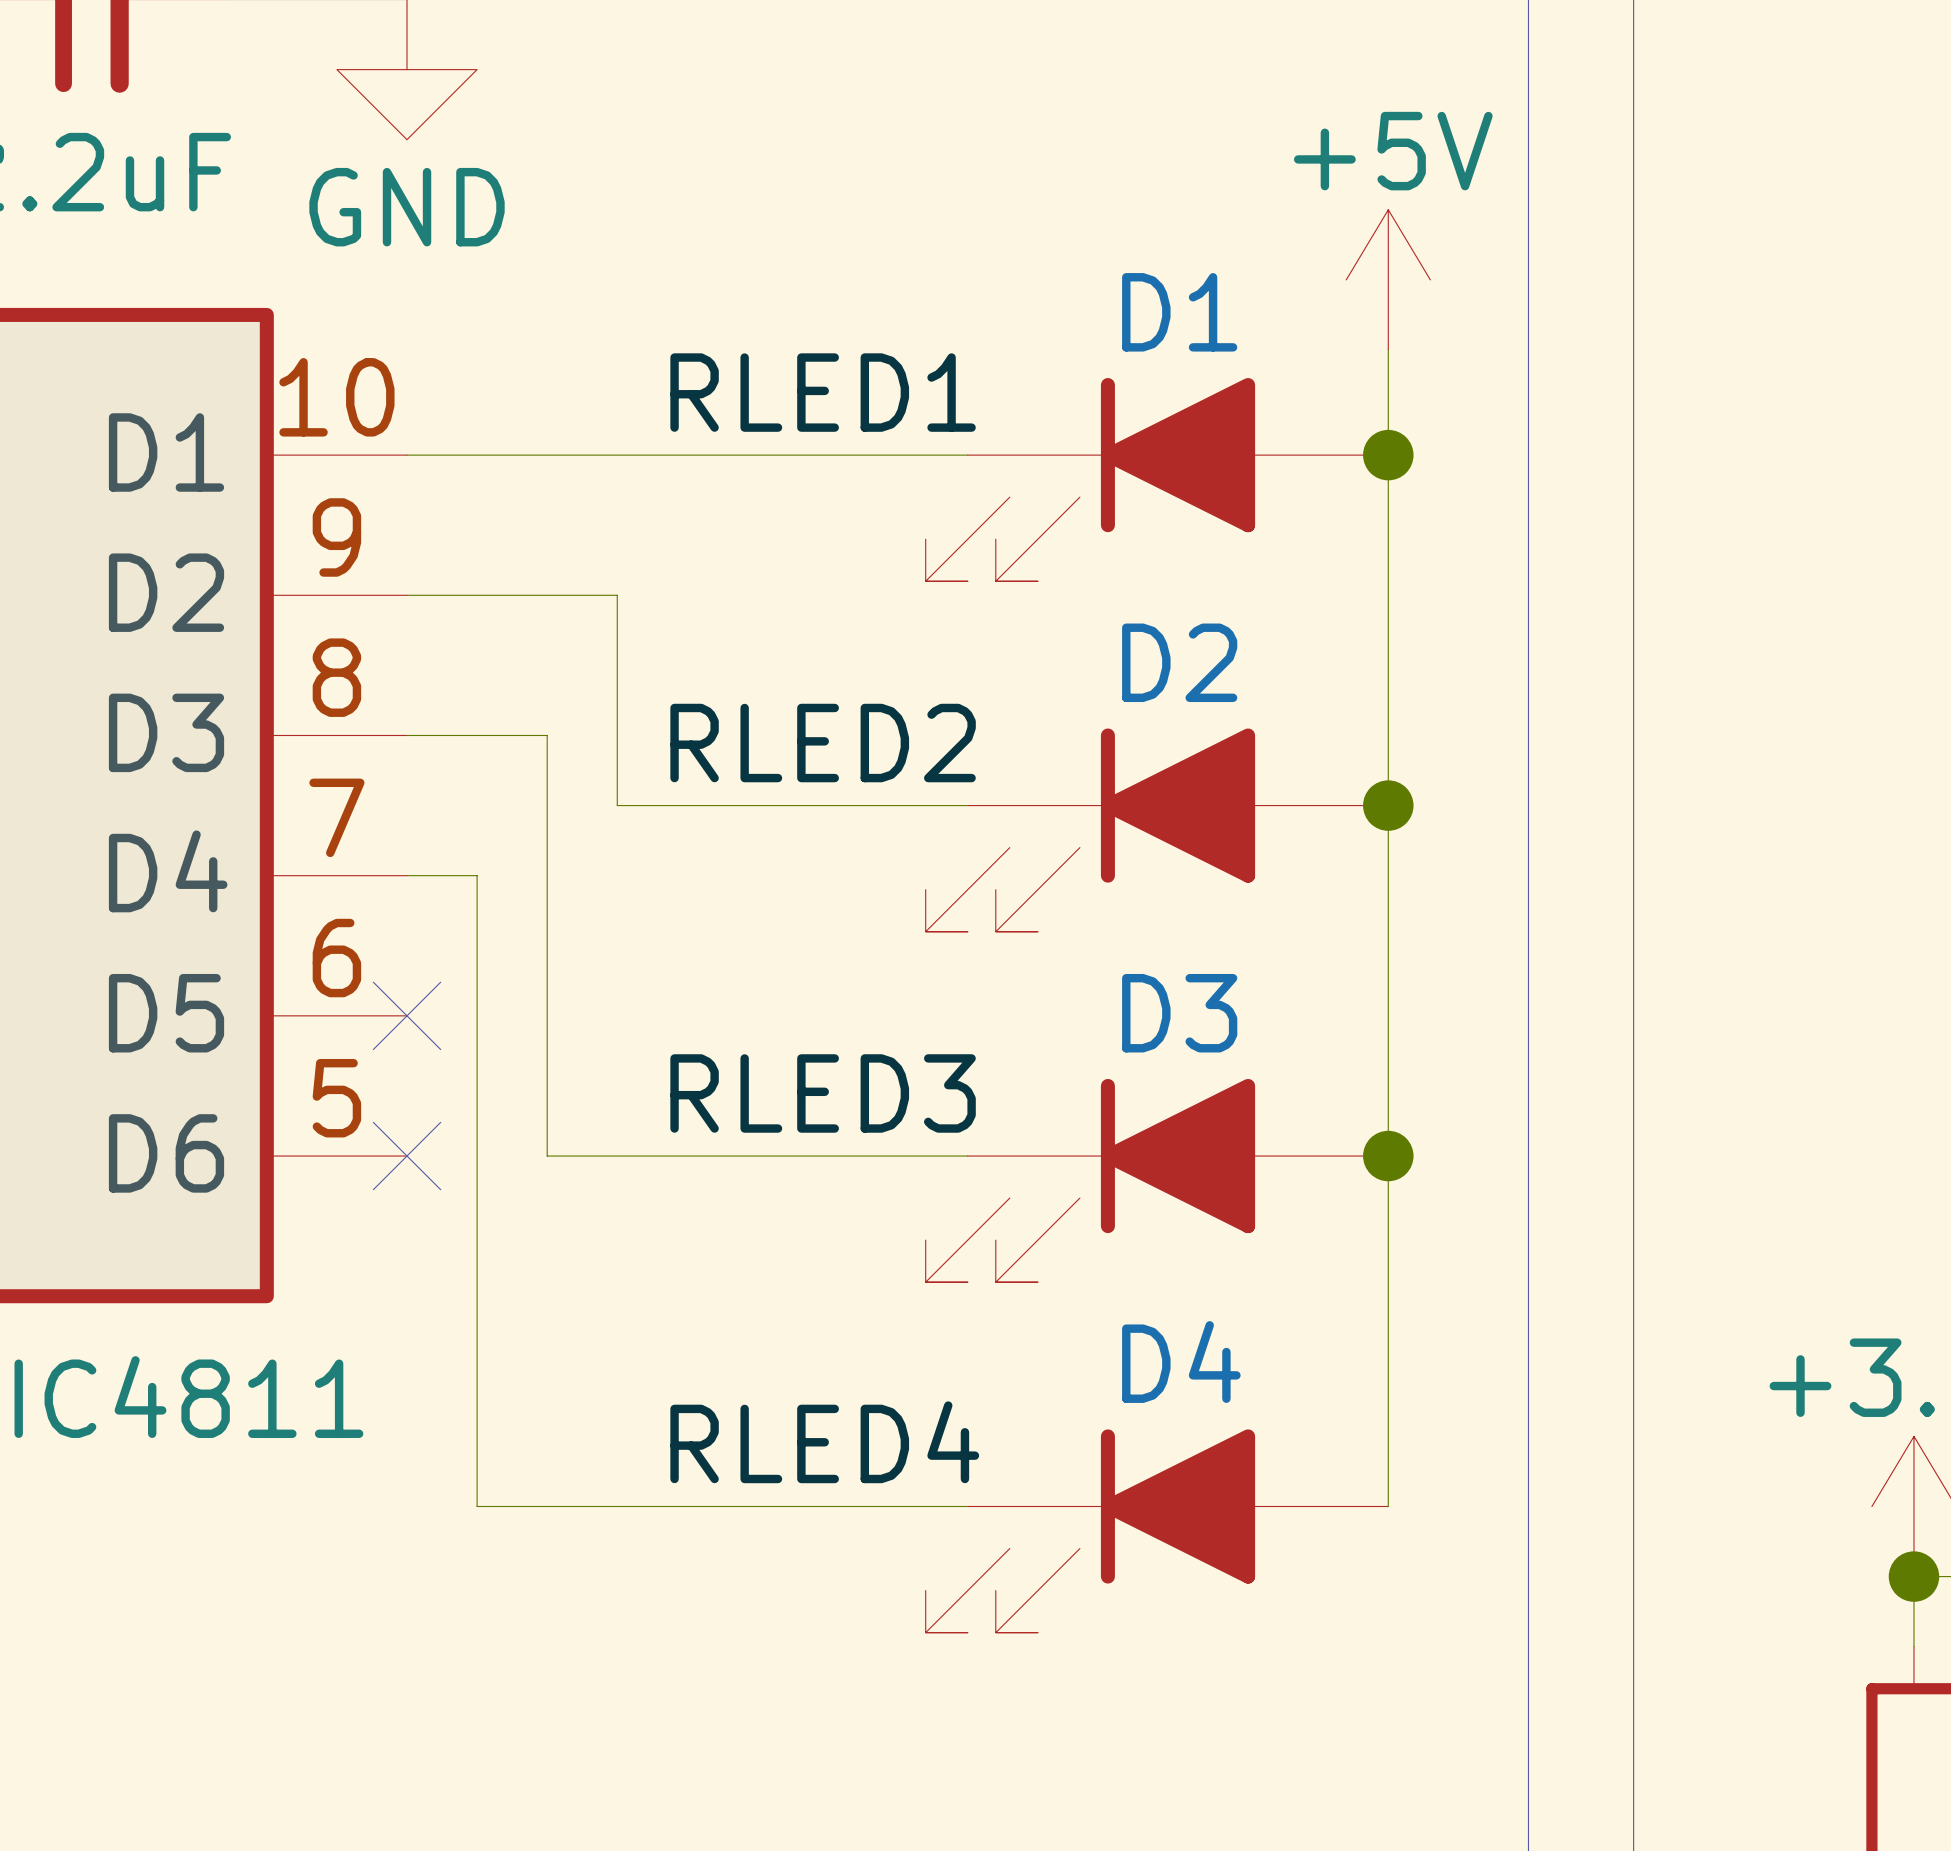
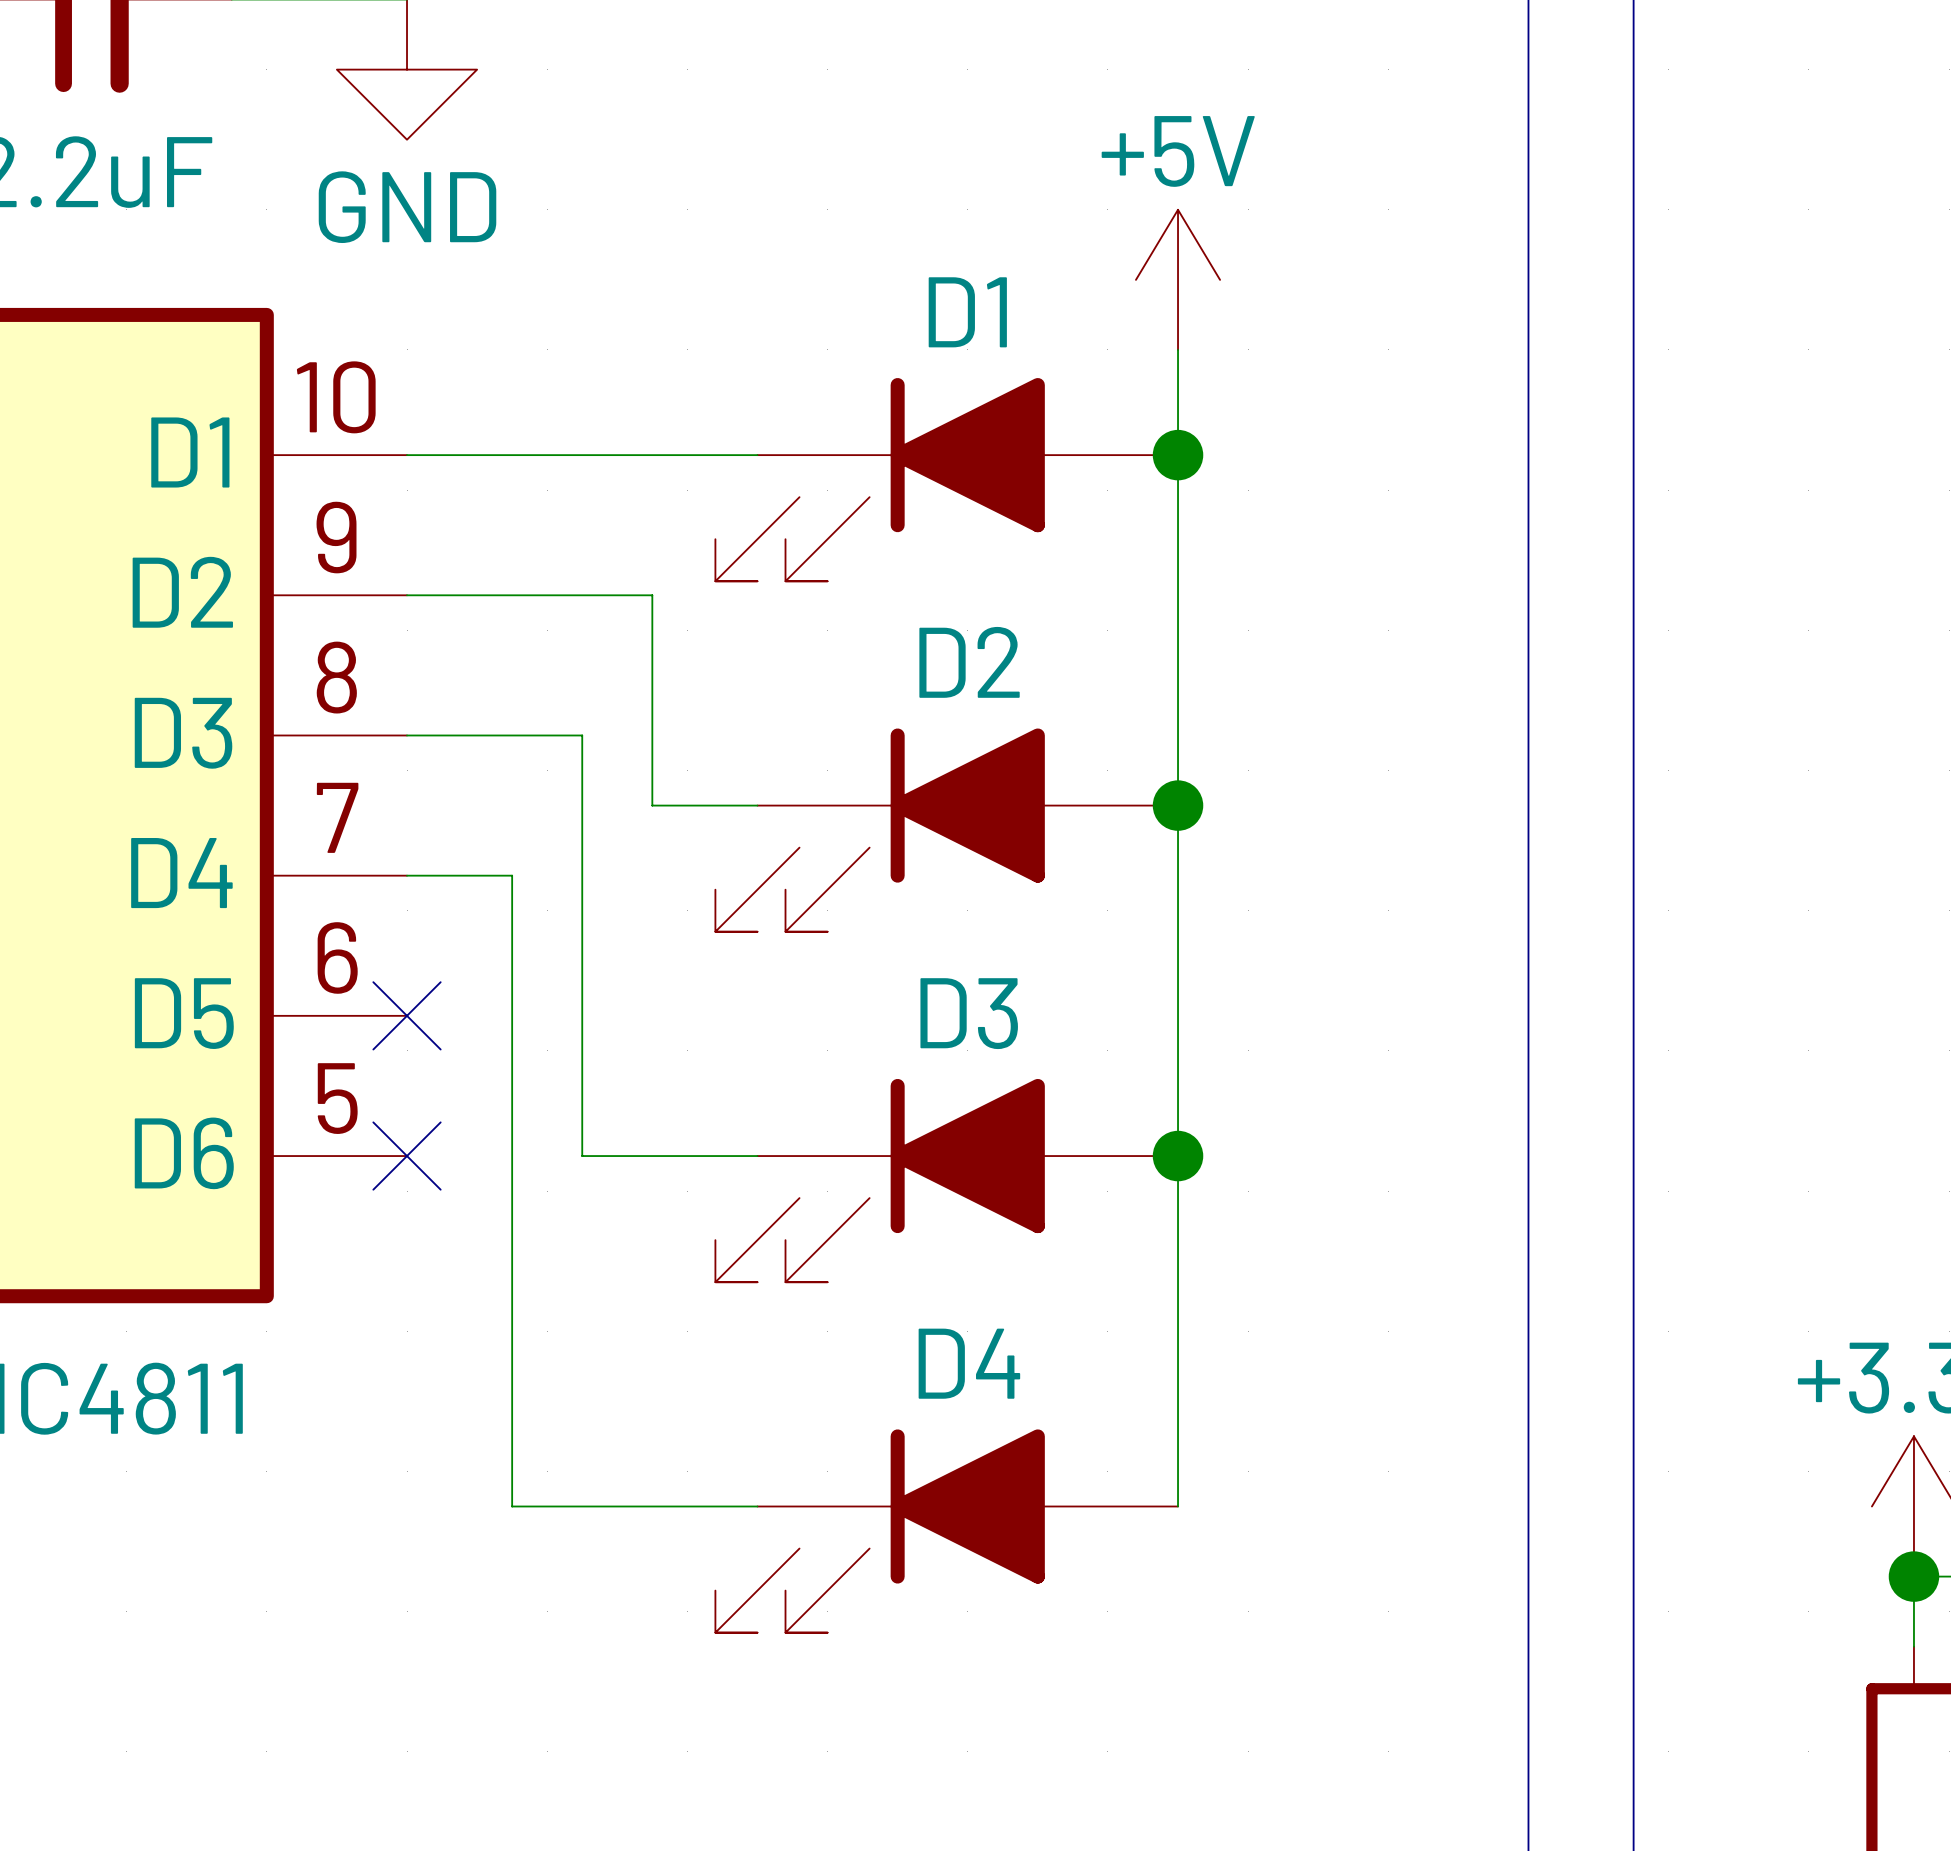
power symbol position: +5V (1388, 279) -> +5V (1178, 279)
wire: (1388, 349) (1388, 1506) -> (1178, 349) (1178, 1506)
label: RLED1 (823, 392) -> none
junction: none -> (1178, 455)
junction: (1388, 455) -> none
D1 position: (1156, 479) -> (946, 479)
wire: (617, 595) (617, 805) (652, 805) -> (617, 595) (652, 595) (652, 805)
wire: (547, 735) (547, 1156) (582, 1156) -> (547, 735) (582, 735) (582, 1156)
label: RLED2 (823, 743) -> none
junction: none -> (1178, 805)
junction: (1388, 805) -> none
D2 position: (1156, 830) -> (946, 830)
wire: (477, 875) (477, 1506) (512, 1506) -> (477, 875) (512, 875) (512, 1506)
label: RLED3 (823, 1093) -> none
junction: none -> (1178, 1156)
junction: (1388, 1156) -> none
D3 position: (1156, 1180) -> (946, 1180)
label: RLED4 (824, 1442) -> none
D4 position: (1156, 1531) -> (946, 1531)

